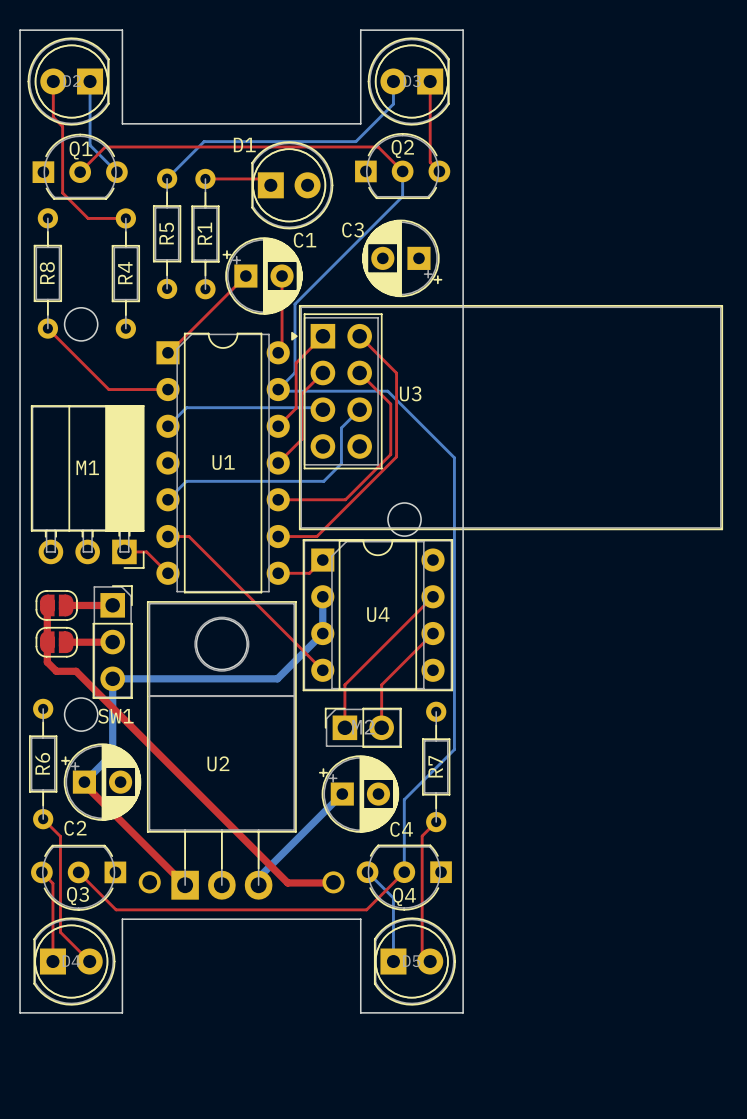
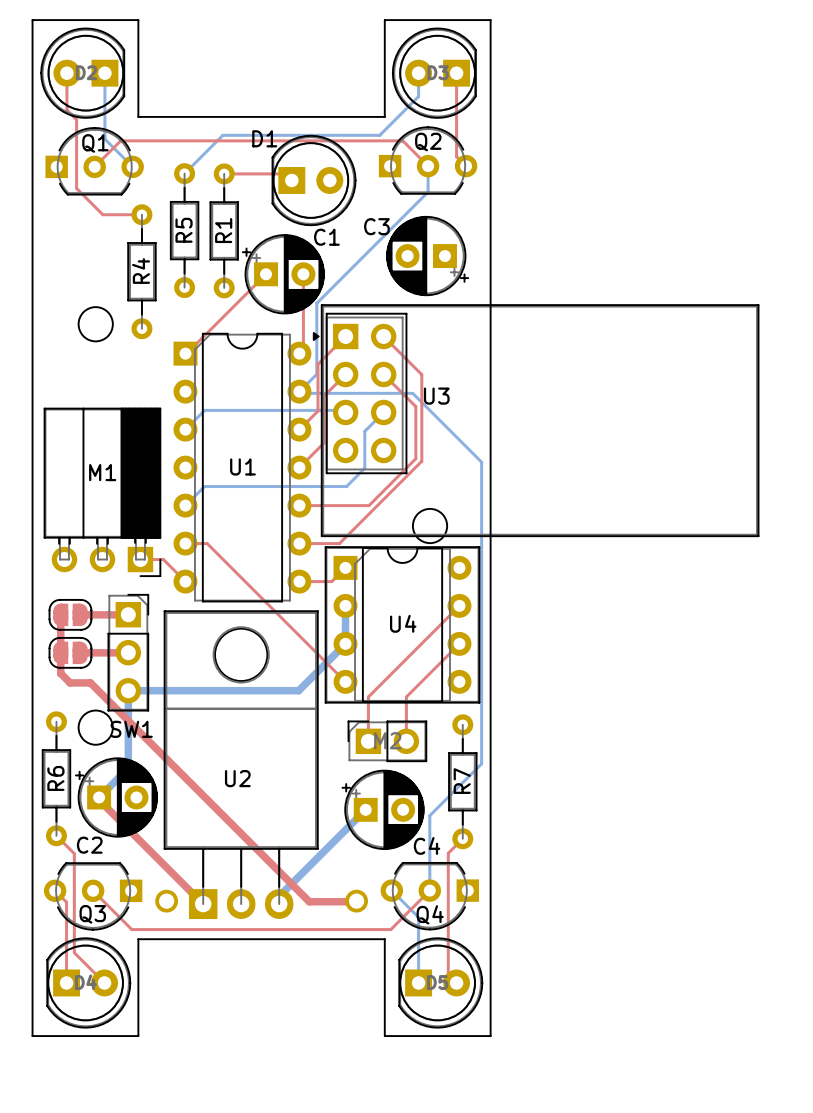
R8: (47, 273) -> none
top track: (47, 328) (108, 389) (167, 389) -> none

